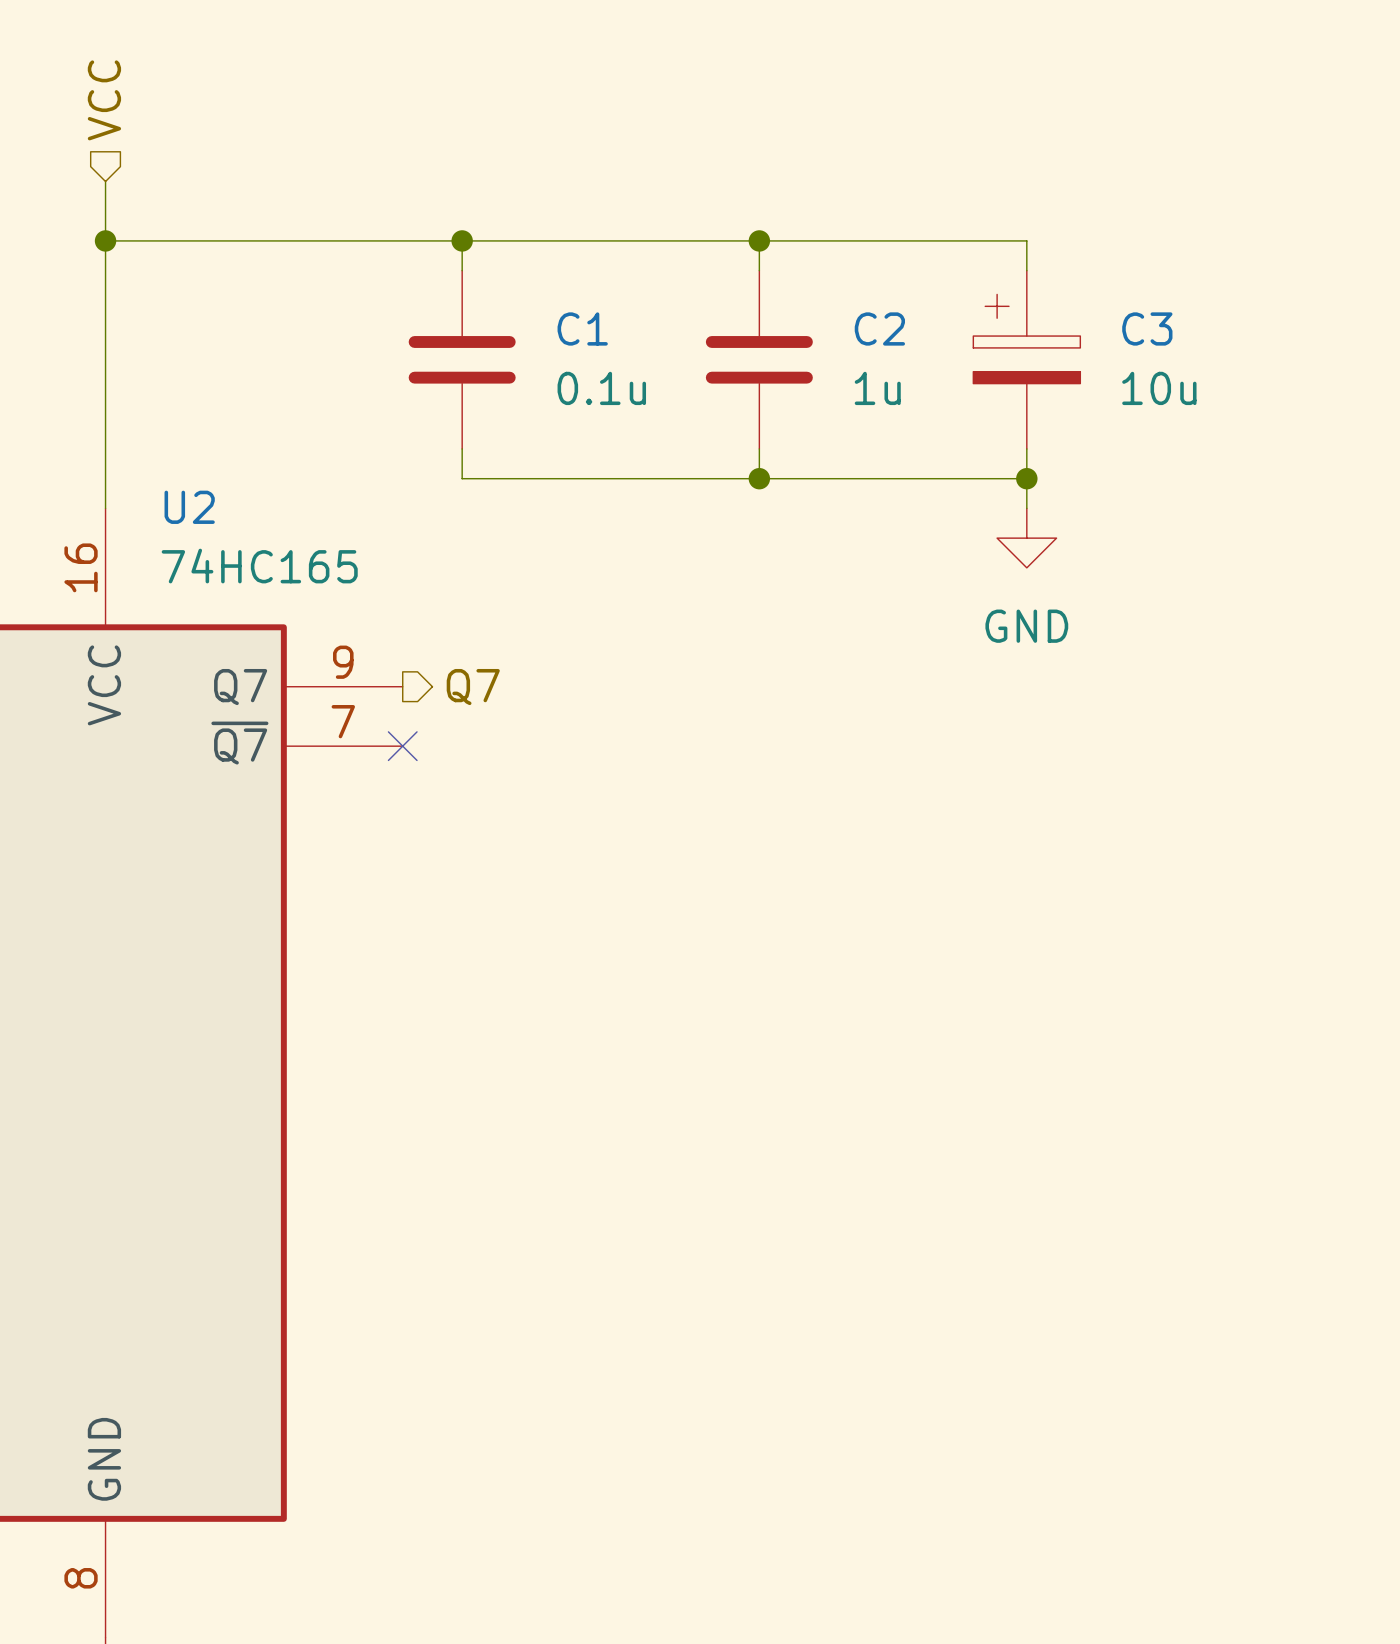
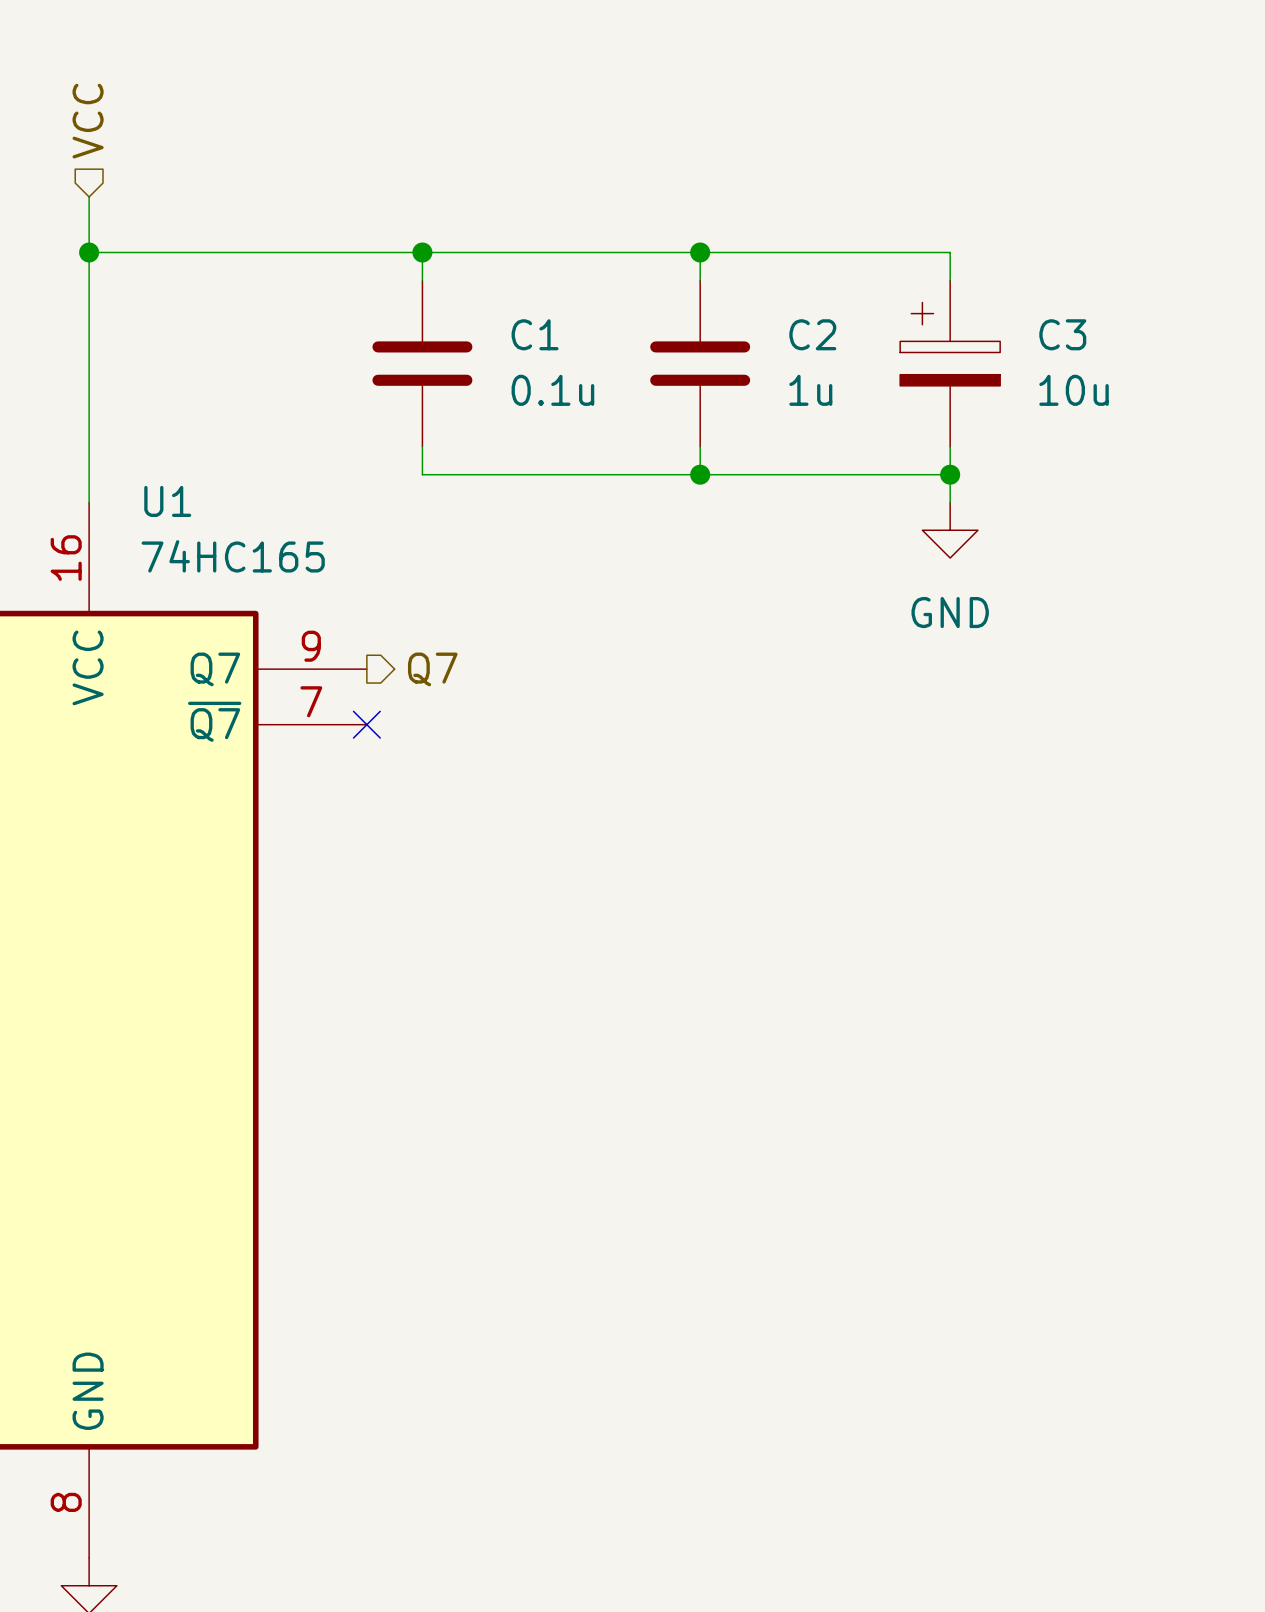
U2 name: U2 (189, 507) -> U1 (167, 501)

